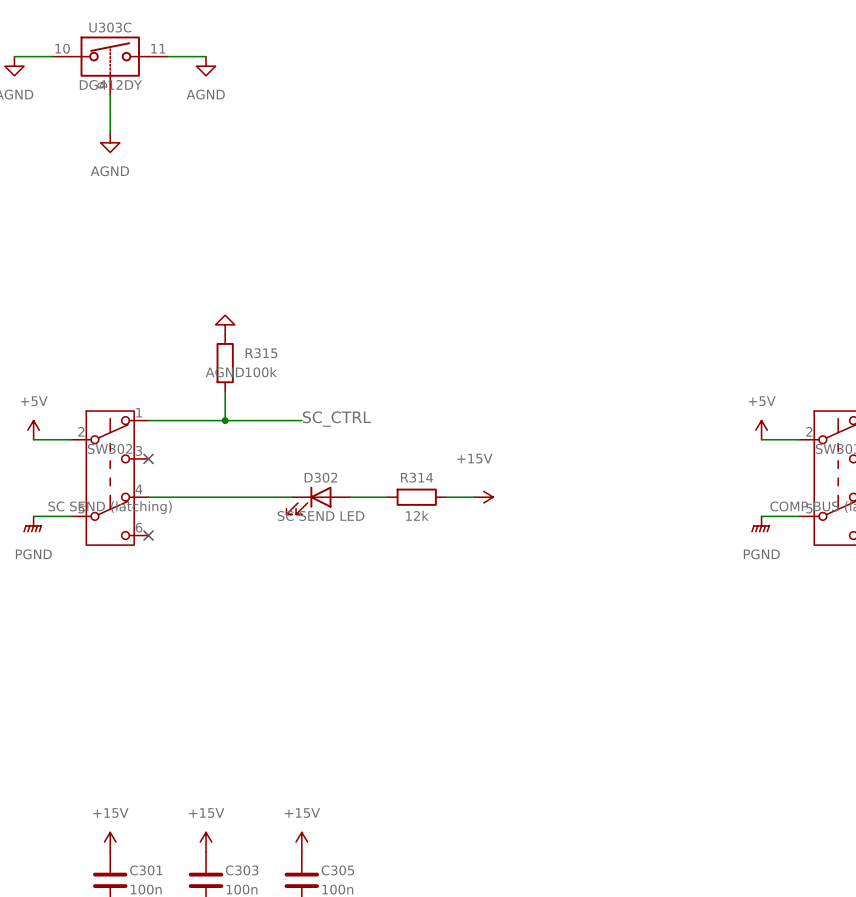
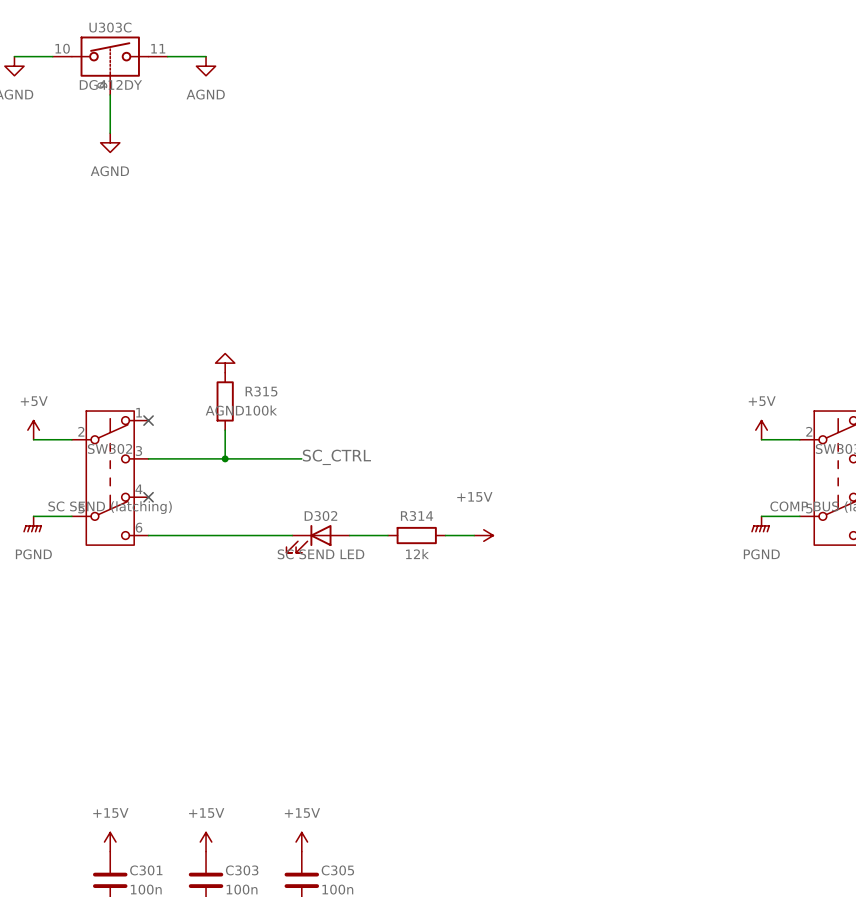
power symbol position: AGND (225, 324) -> AGND (225, 363)
R315 position: (225, 363) -> (225, 401)
wire: (225, 391) (225, 420) -> (225, 430) (225, 458)
label position: SC_CTRL (336, 419) -> SC_CTRL (336, 457)
wire: (148, 420) (301, 420) -> (148, 458) (301, 458)
no-connect mark: none -> (148, 420)
junction position: (225, 420) -> (225, 458)
no-connect mark: (148, 458) -> none
wire: (148, 497) (292, 497) -> (148, 535) (292, 535)
no-connect mark: none -> (148, 497)
wire: (349, 497) (388, 497) -> (349, 535) (388, 535)
R314 position: (416, 497) -> (416, 535)
wire: (445, 497) (474, 497) -> (445, 535) (474, 535)
power symbol position: +15V (483, 497) -> +15V (483, 535)
D302 position: (318, 500) -> (318, 538)
no-connect mark: (148, 535) -> none

